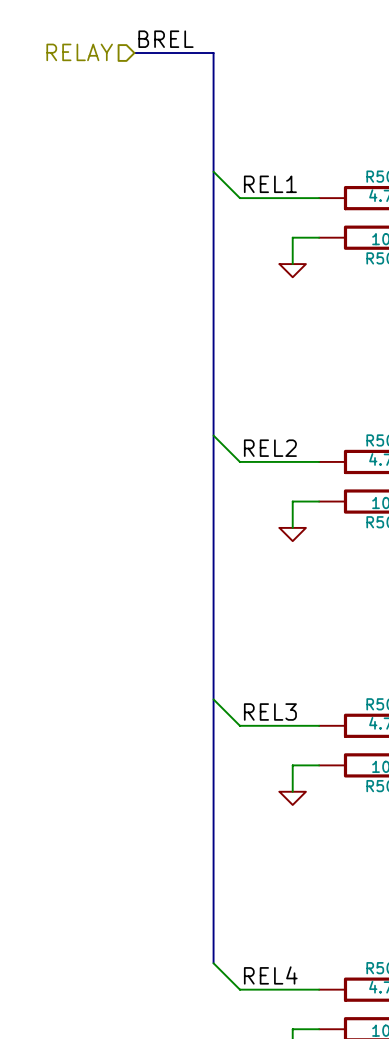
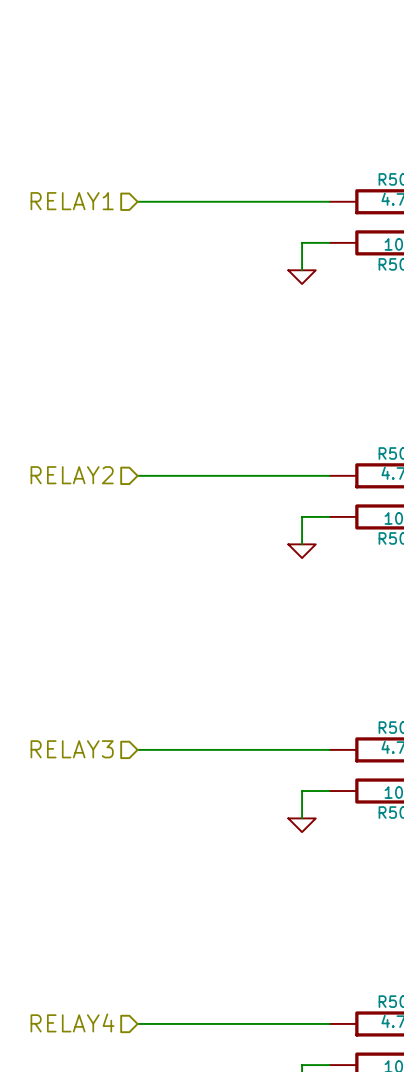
label: BREL (165, 39) -> none
hierarchical label: RELAY (79, 52) -> none
bus: (134, 53) (213, 53) (213, 963) -> none
wire: (213, 171) (239, 198) -> (137, 201) (247, 201)
label: REL1 (270, 184) -> none
hierarchical label: none -> RELAY1 (72, 201)
wire: (213, 435) (239, 461) -> (137, 475) (247, 475)
label: REL2 (270, 448) -> none
hierarchical label: none -> RELAY2 (72, 475)
wire: (213, 699) (239, 725) -> (137, 749) (247, 749)
label: REL3 (270, 712) -> none
hierarchical label: none -> RELAY3 (72, 749)
wire: (213, 963) (239, 989) -> (137, 1023) (247, 1023)
label: REL4 (270, 975) -> none
hierarchical label: none -> RELAY4 (72, 1022)

